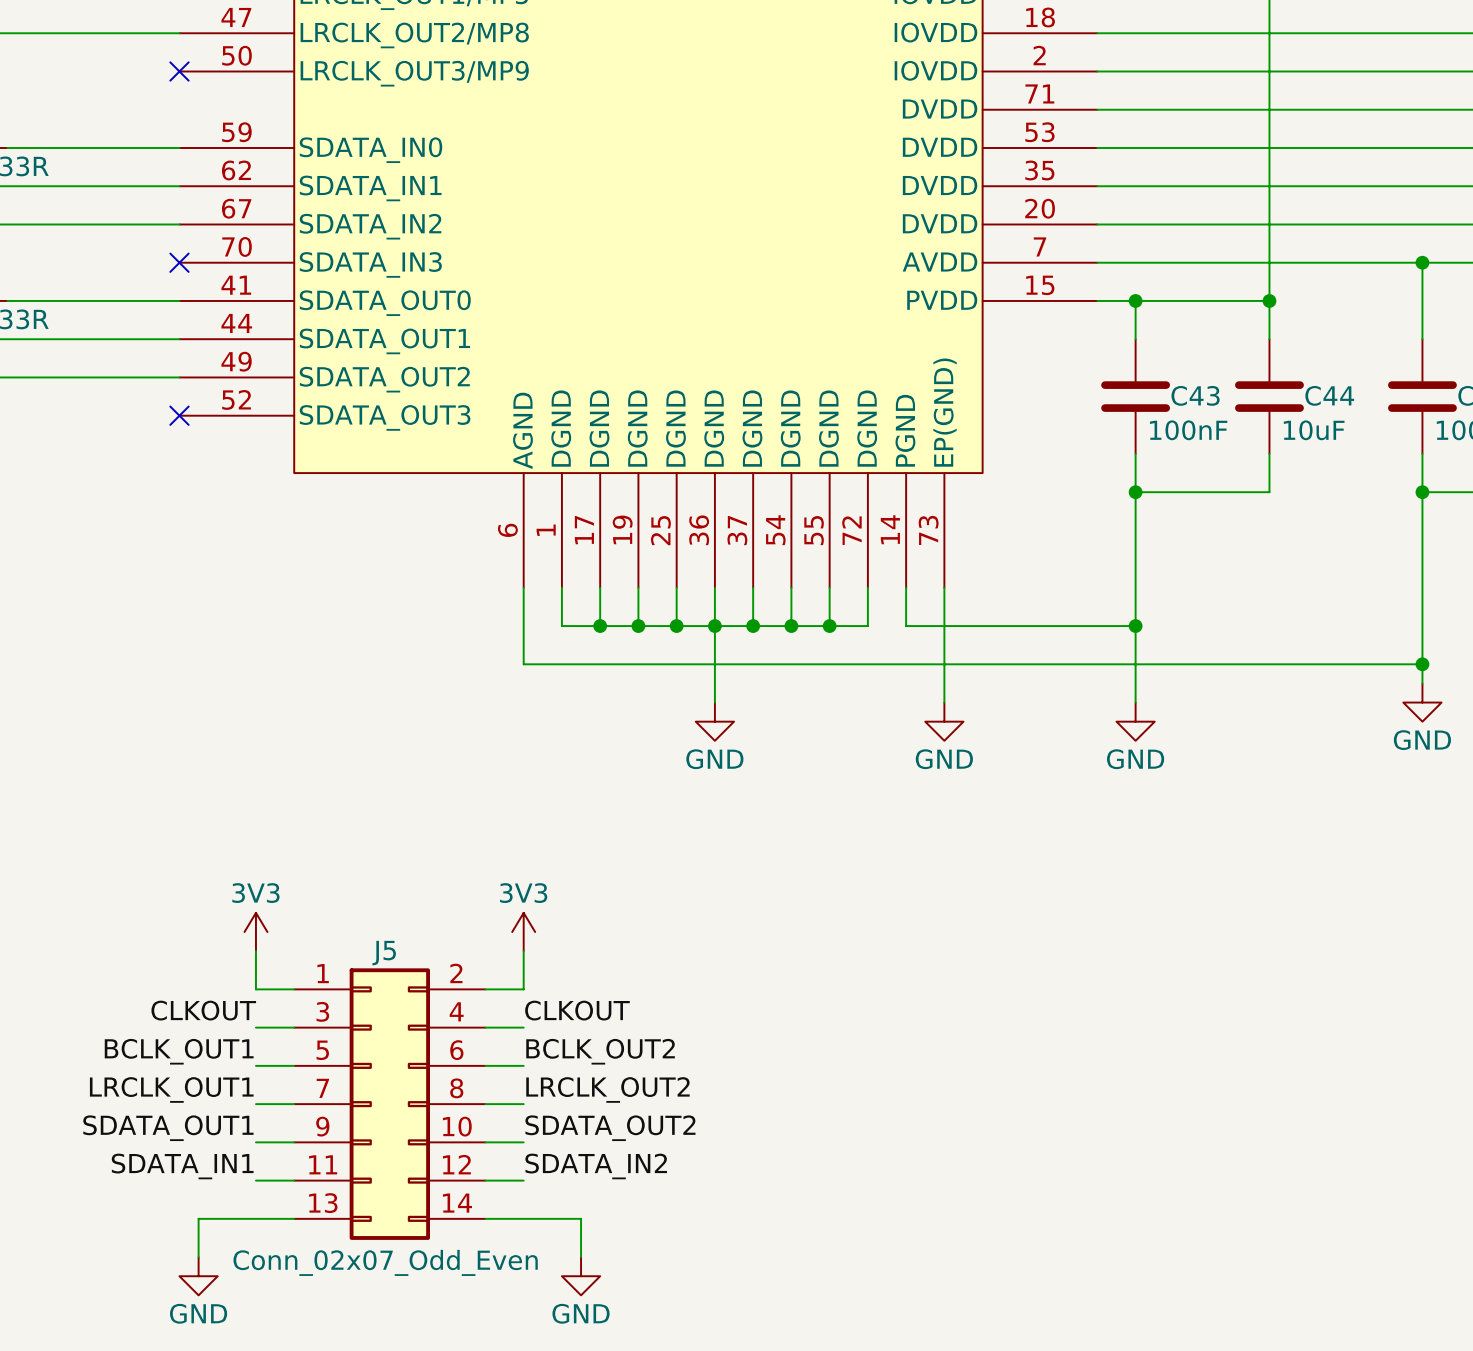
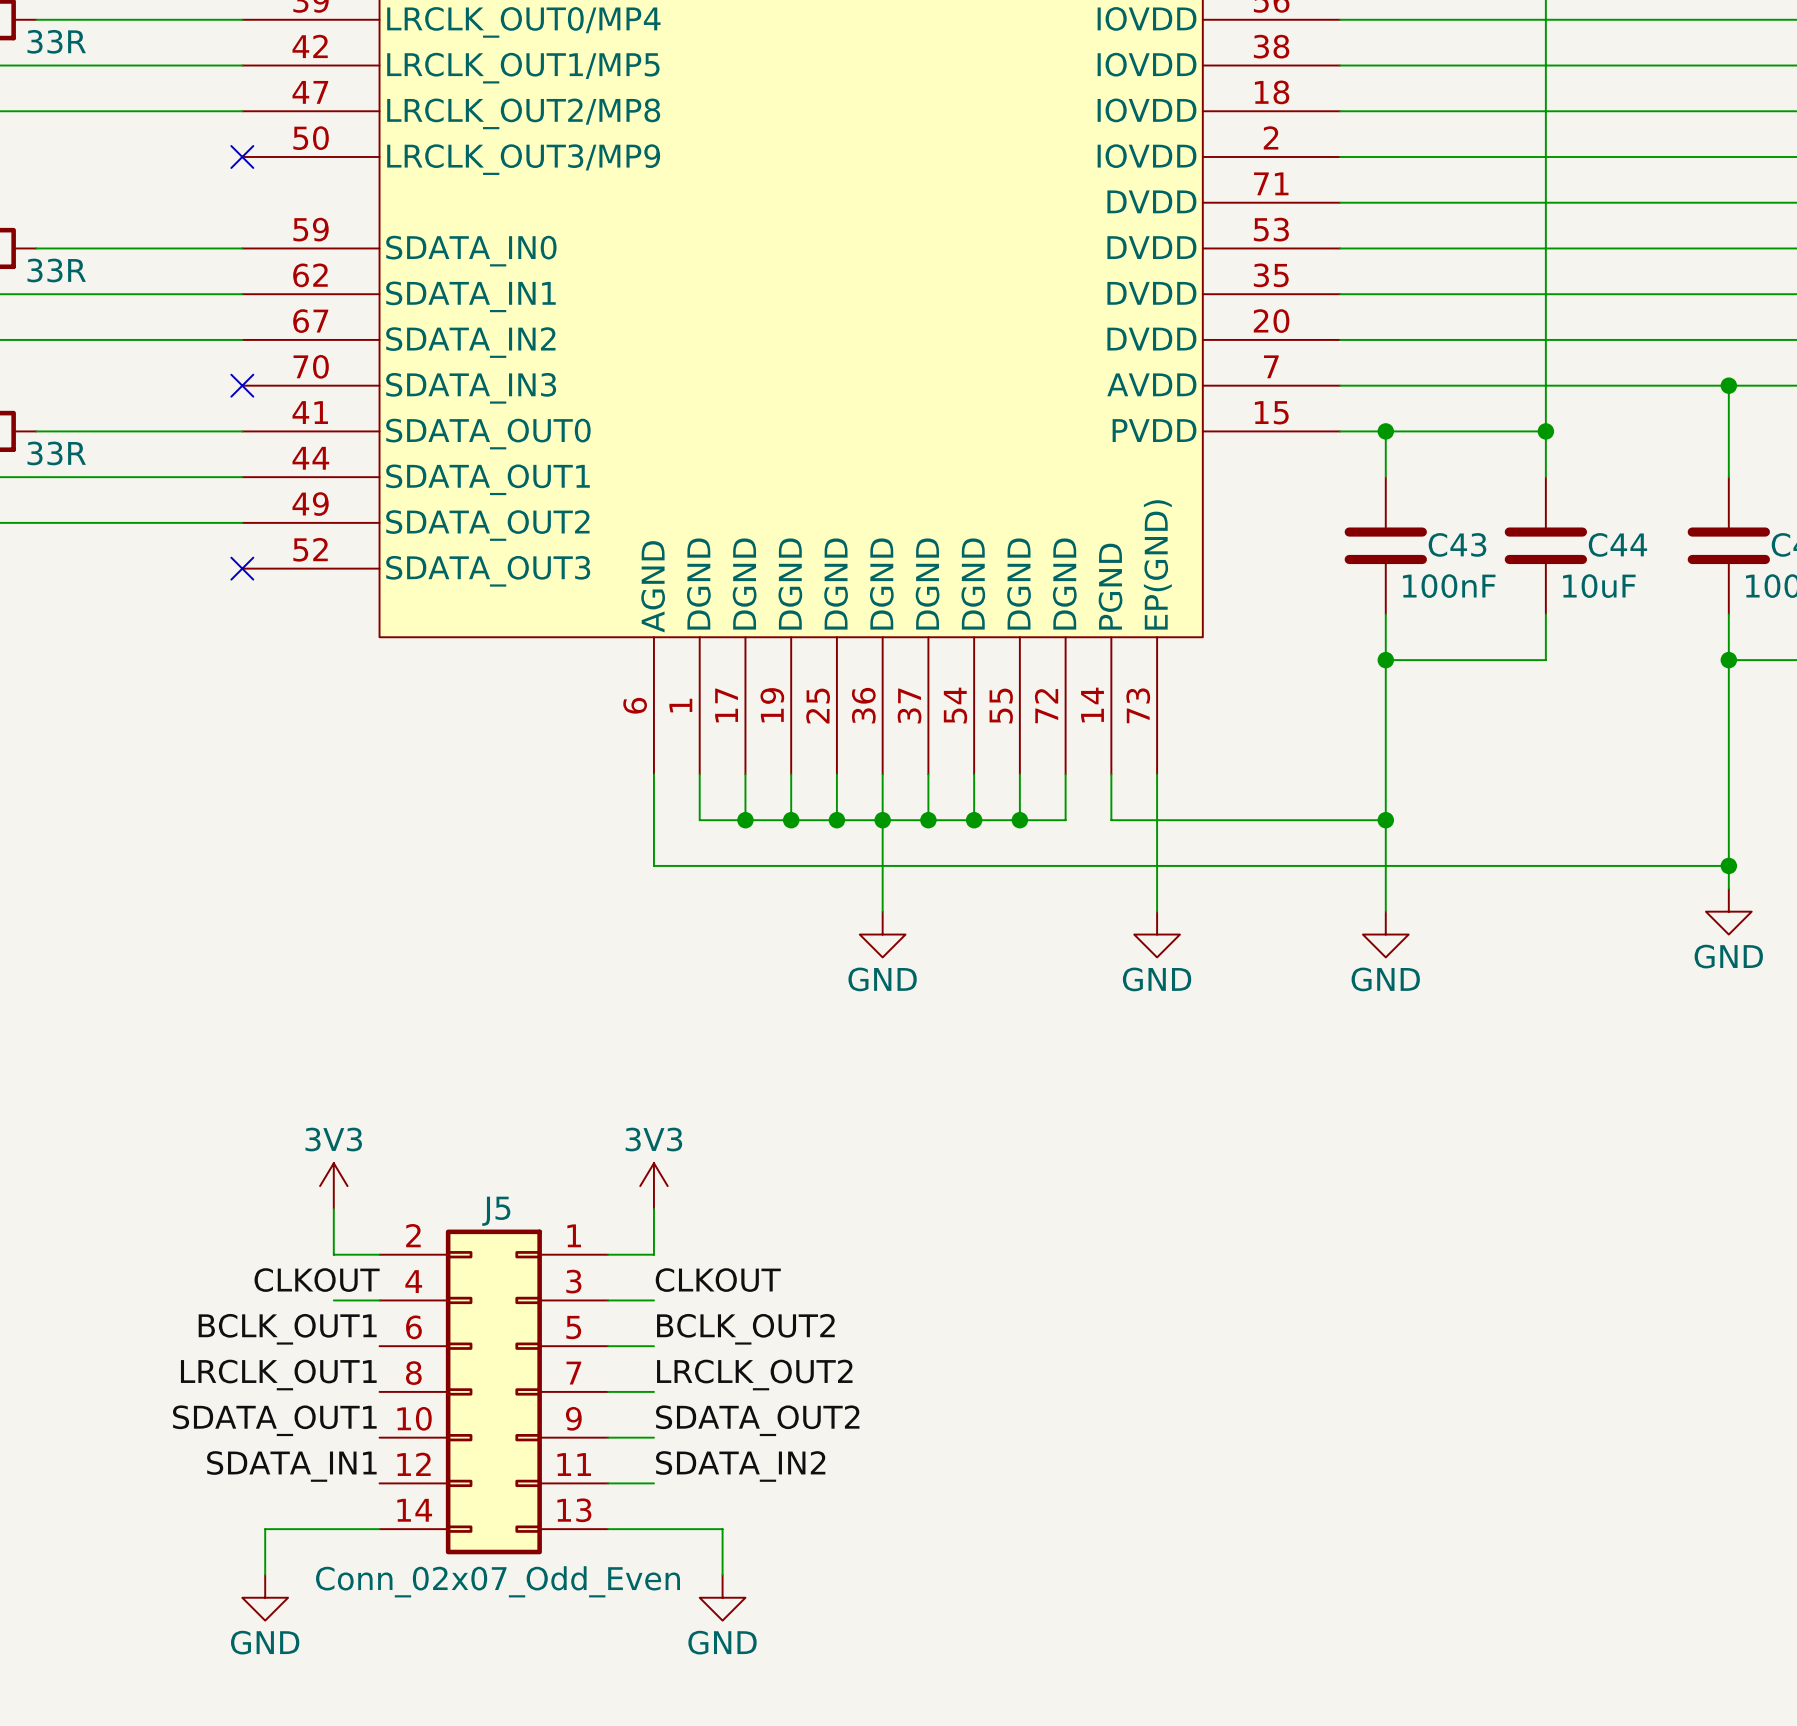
label position: CLKOUT (203, 1010) -> CLKOUT (317, 1280)
label position: BCLK_OUT1 (179, 1051) -> BCLK_OUT1 (287, 1329)
wire: (255, 1065) (294, 1065) -> none
label position: LRCLK_OUT1 (171, 1089) -> LRCLK_OUT1 (278, 1375)
wire: (255, 1104) (294, 1104) -> none
J5 flip: as is (389, 1104) -> left-right (493, 1391)
label position: SDATA_OUT1 (168, 1128) -> SDATA_OUT1 (274, 1420)
wire: (255, 1142) (294, 1142) -> none
label position: SDATA_IN1 (182, 1166) -> SDATA_IN1 (291, 1466)
wire: (255, 1180) (294, 1180) -> none

